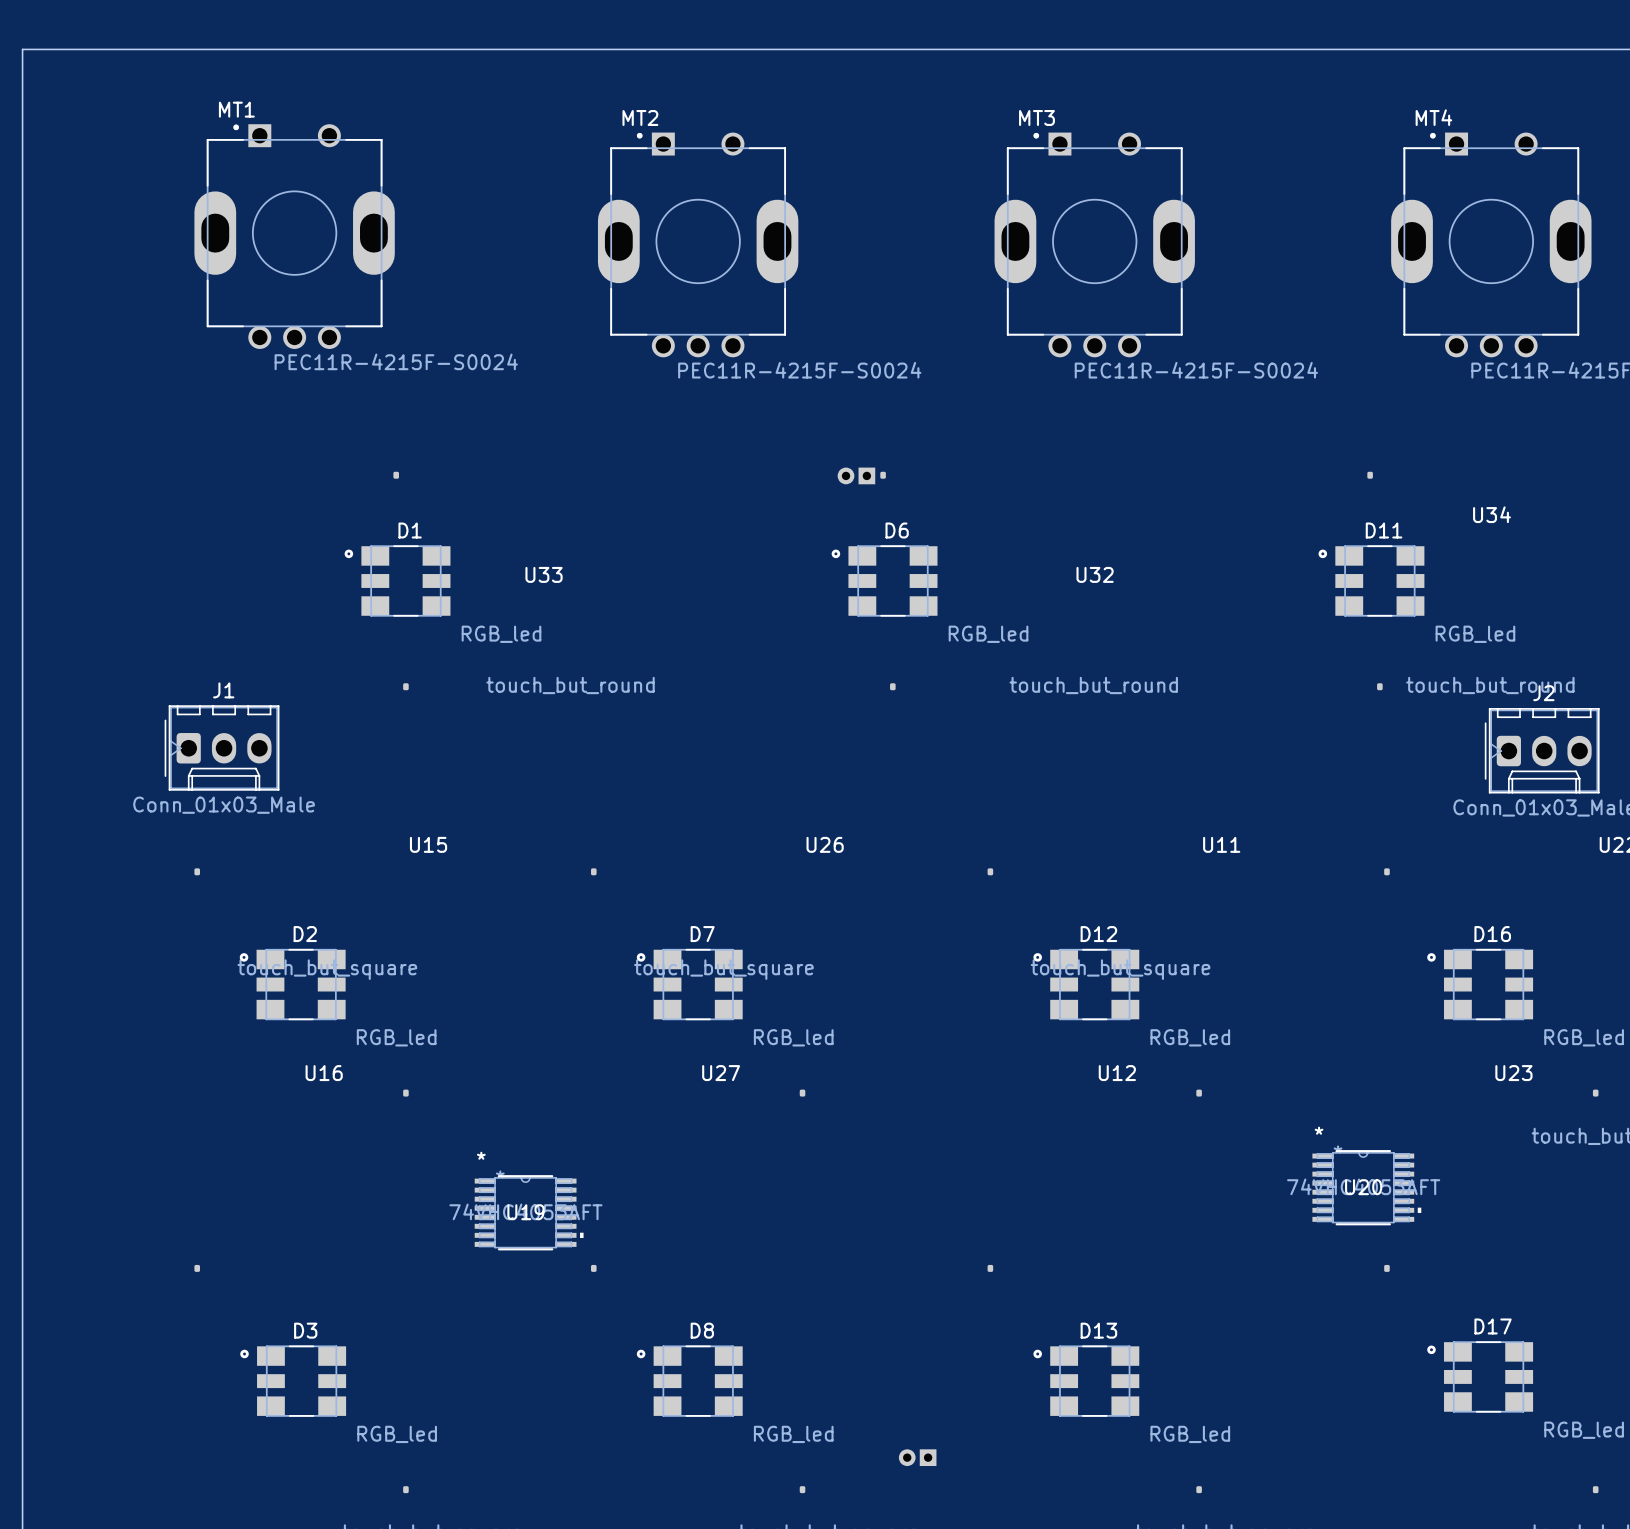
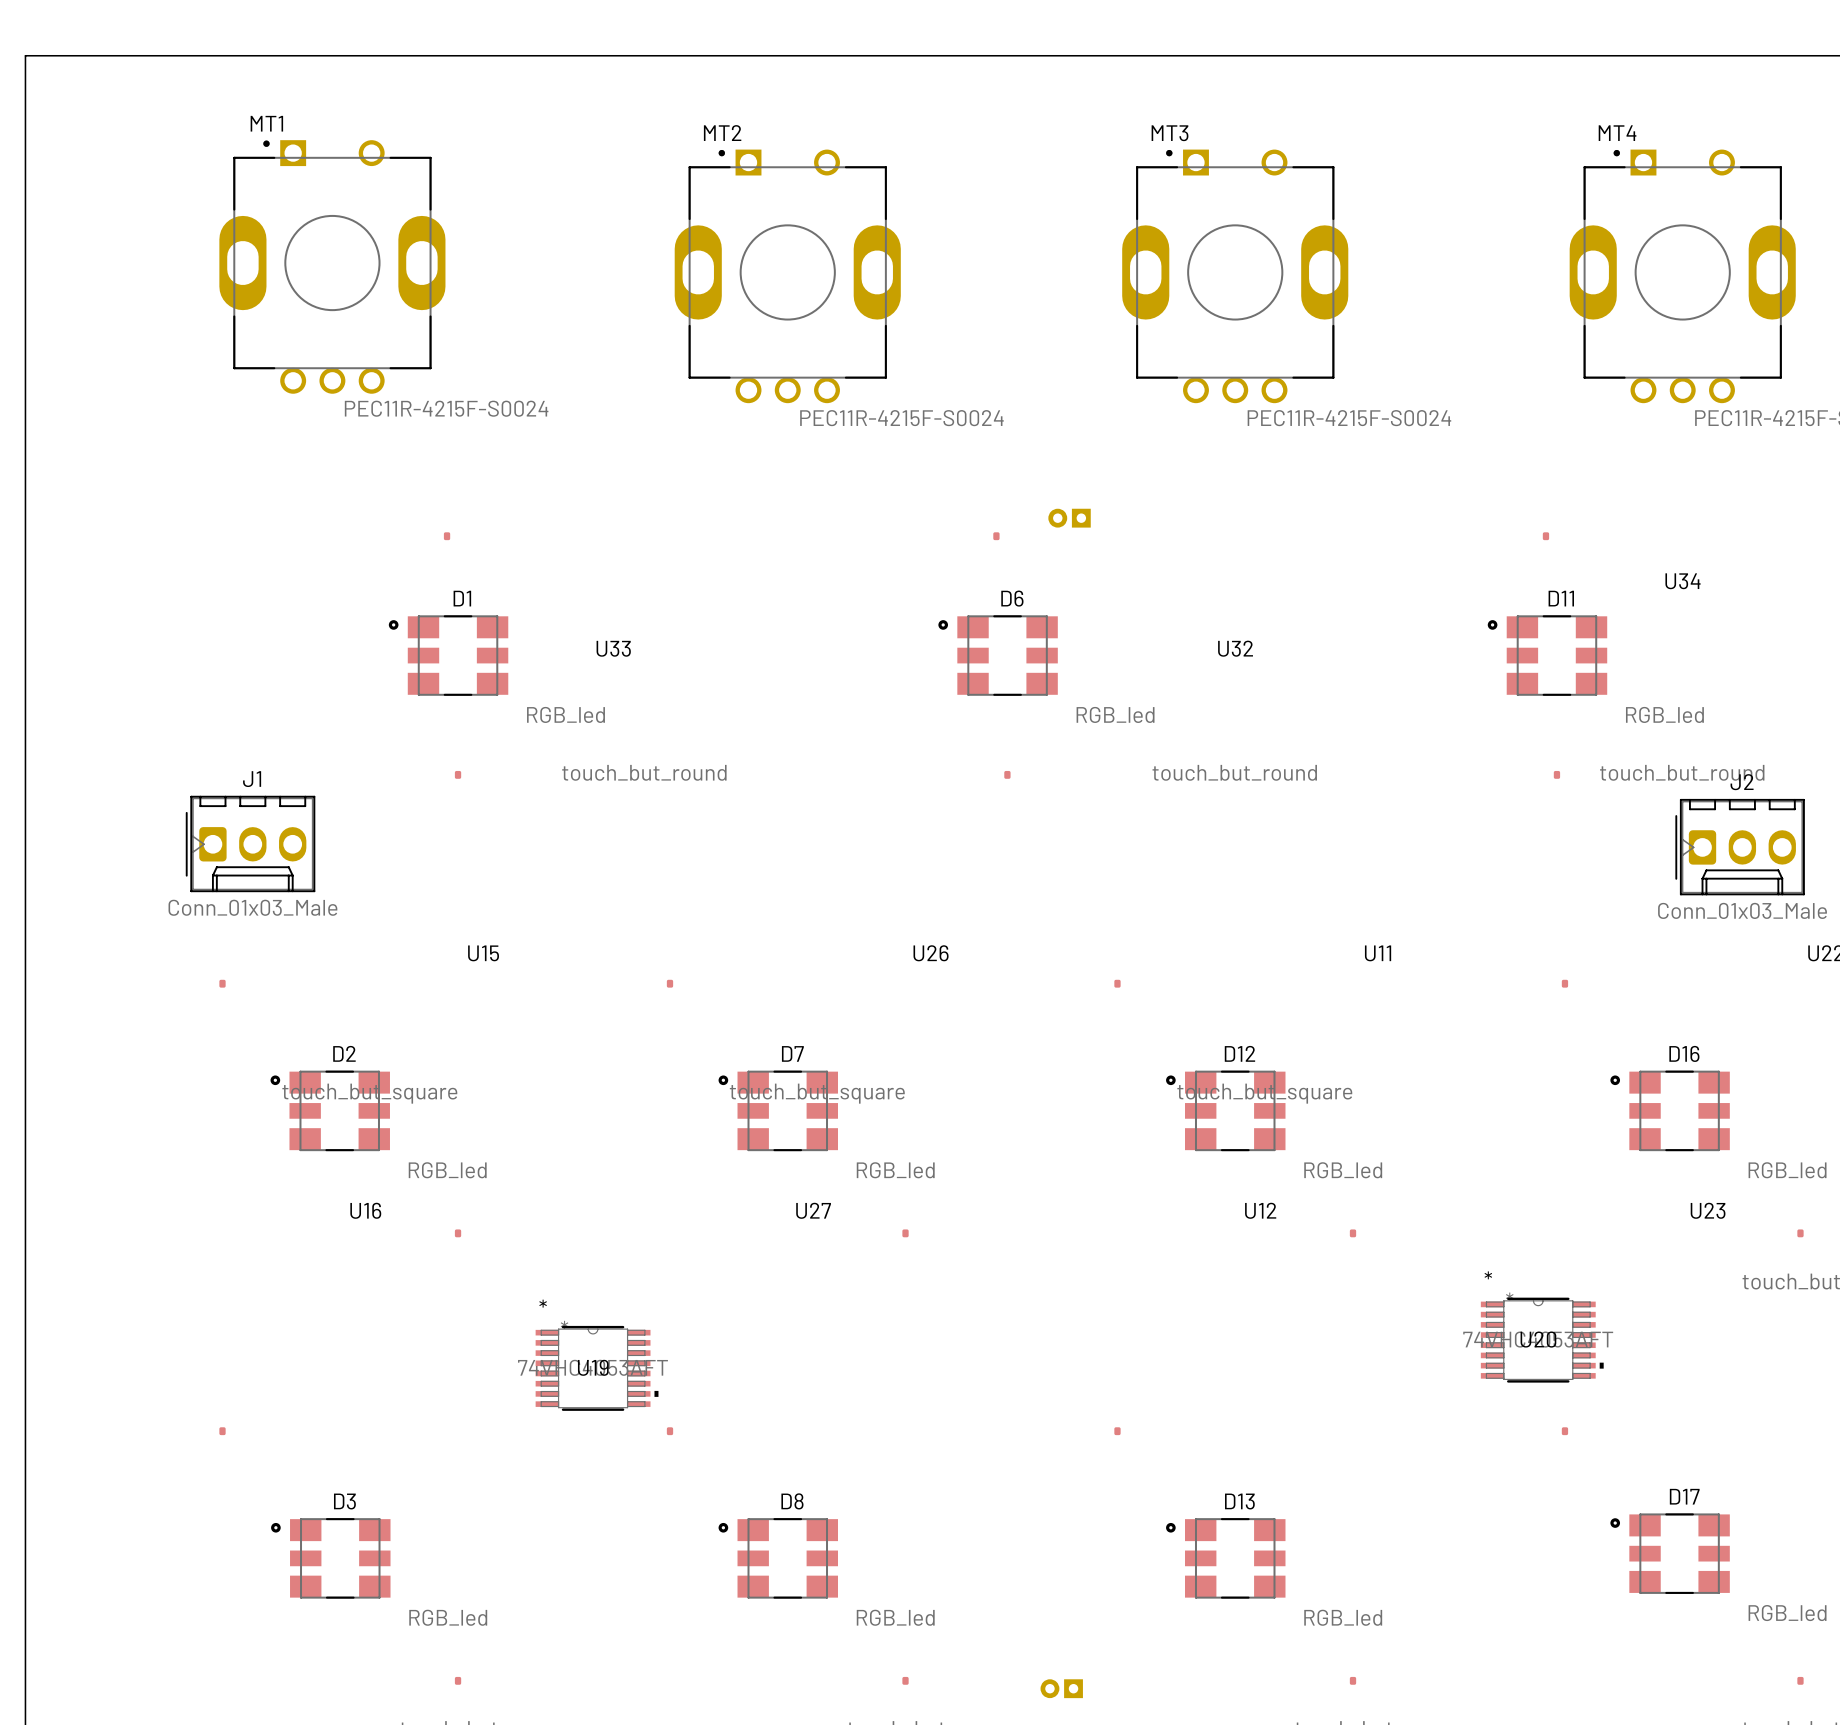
part position: (856, 475) -> (1069, 518)
part position: (917, 1457) -> (1061, 1688)

